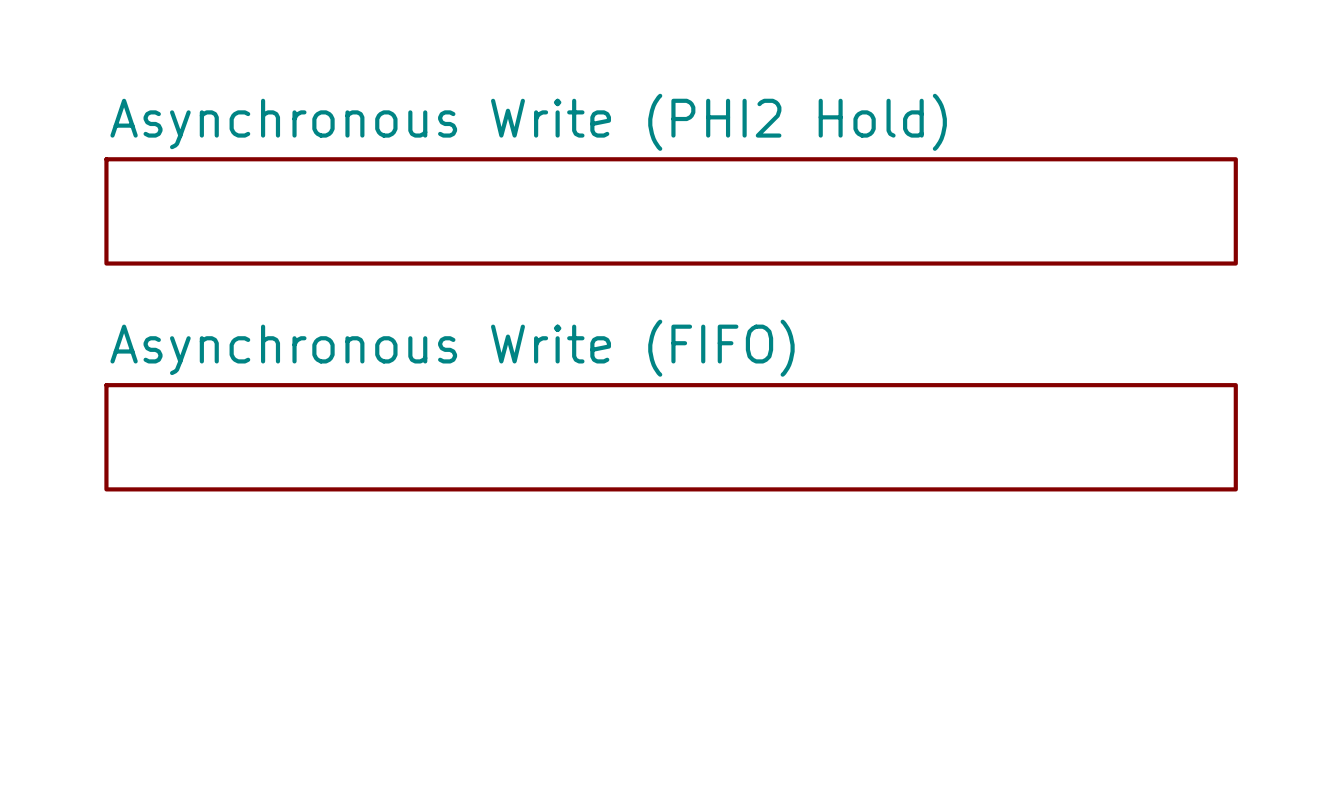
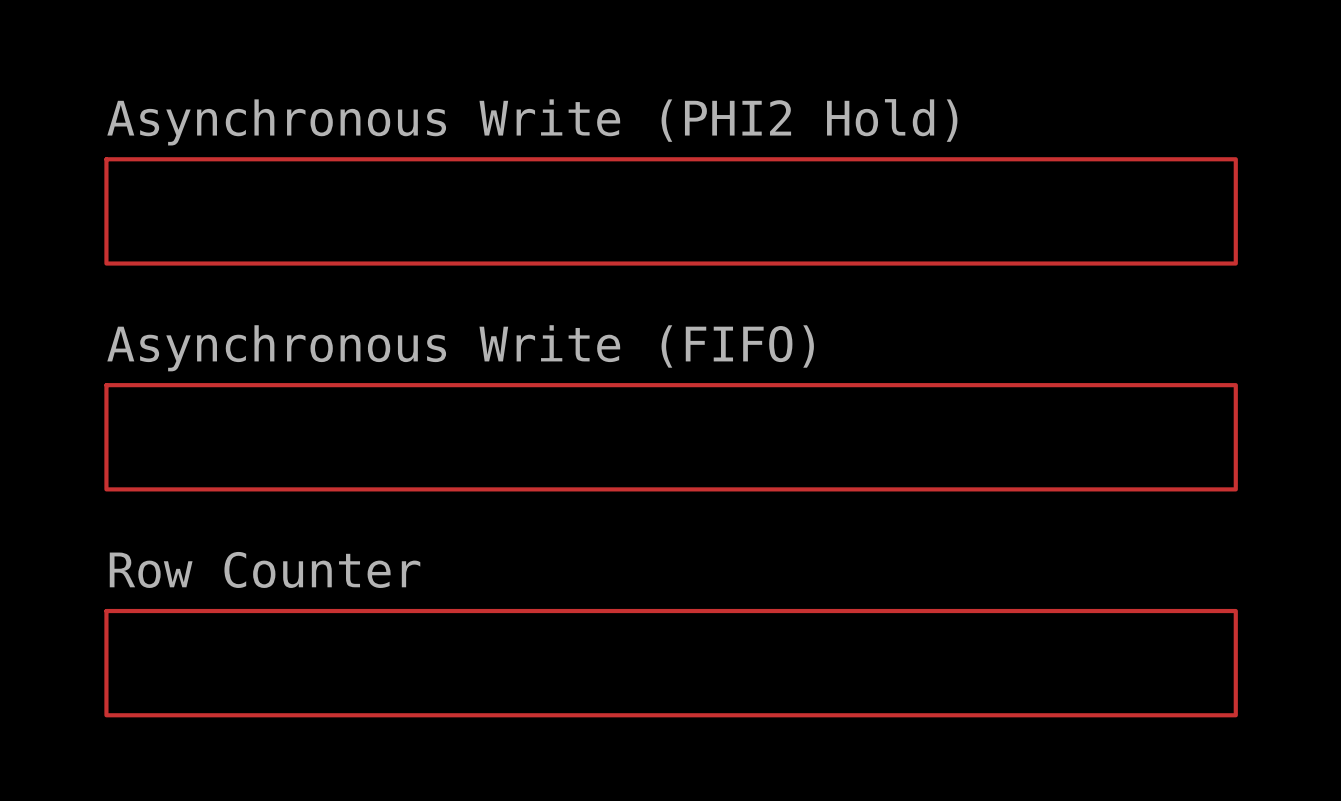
sheet Row Counter: none -> (671, 663)

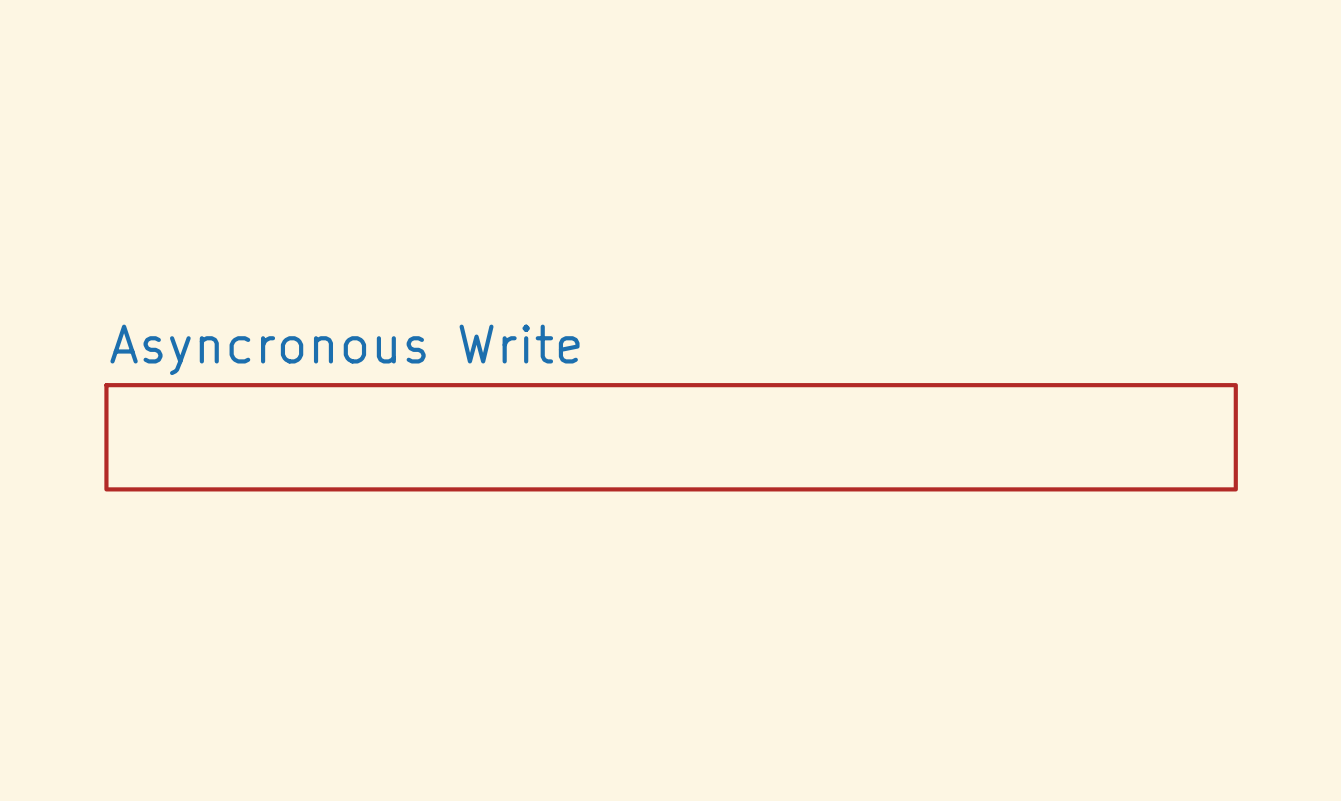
sheet Asynchronous Write (PHI2 Hold): (671, 211) -> none
sheet Asynchronous Write (FIFO) name: Asynchronous Write (FIFO) (460, 348) -> Asyncronous Write (344, 349)
sheet Row Counter: (671, 663) -> none

